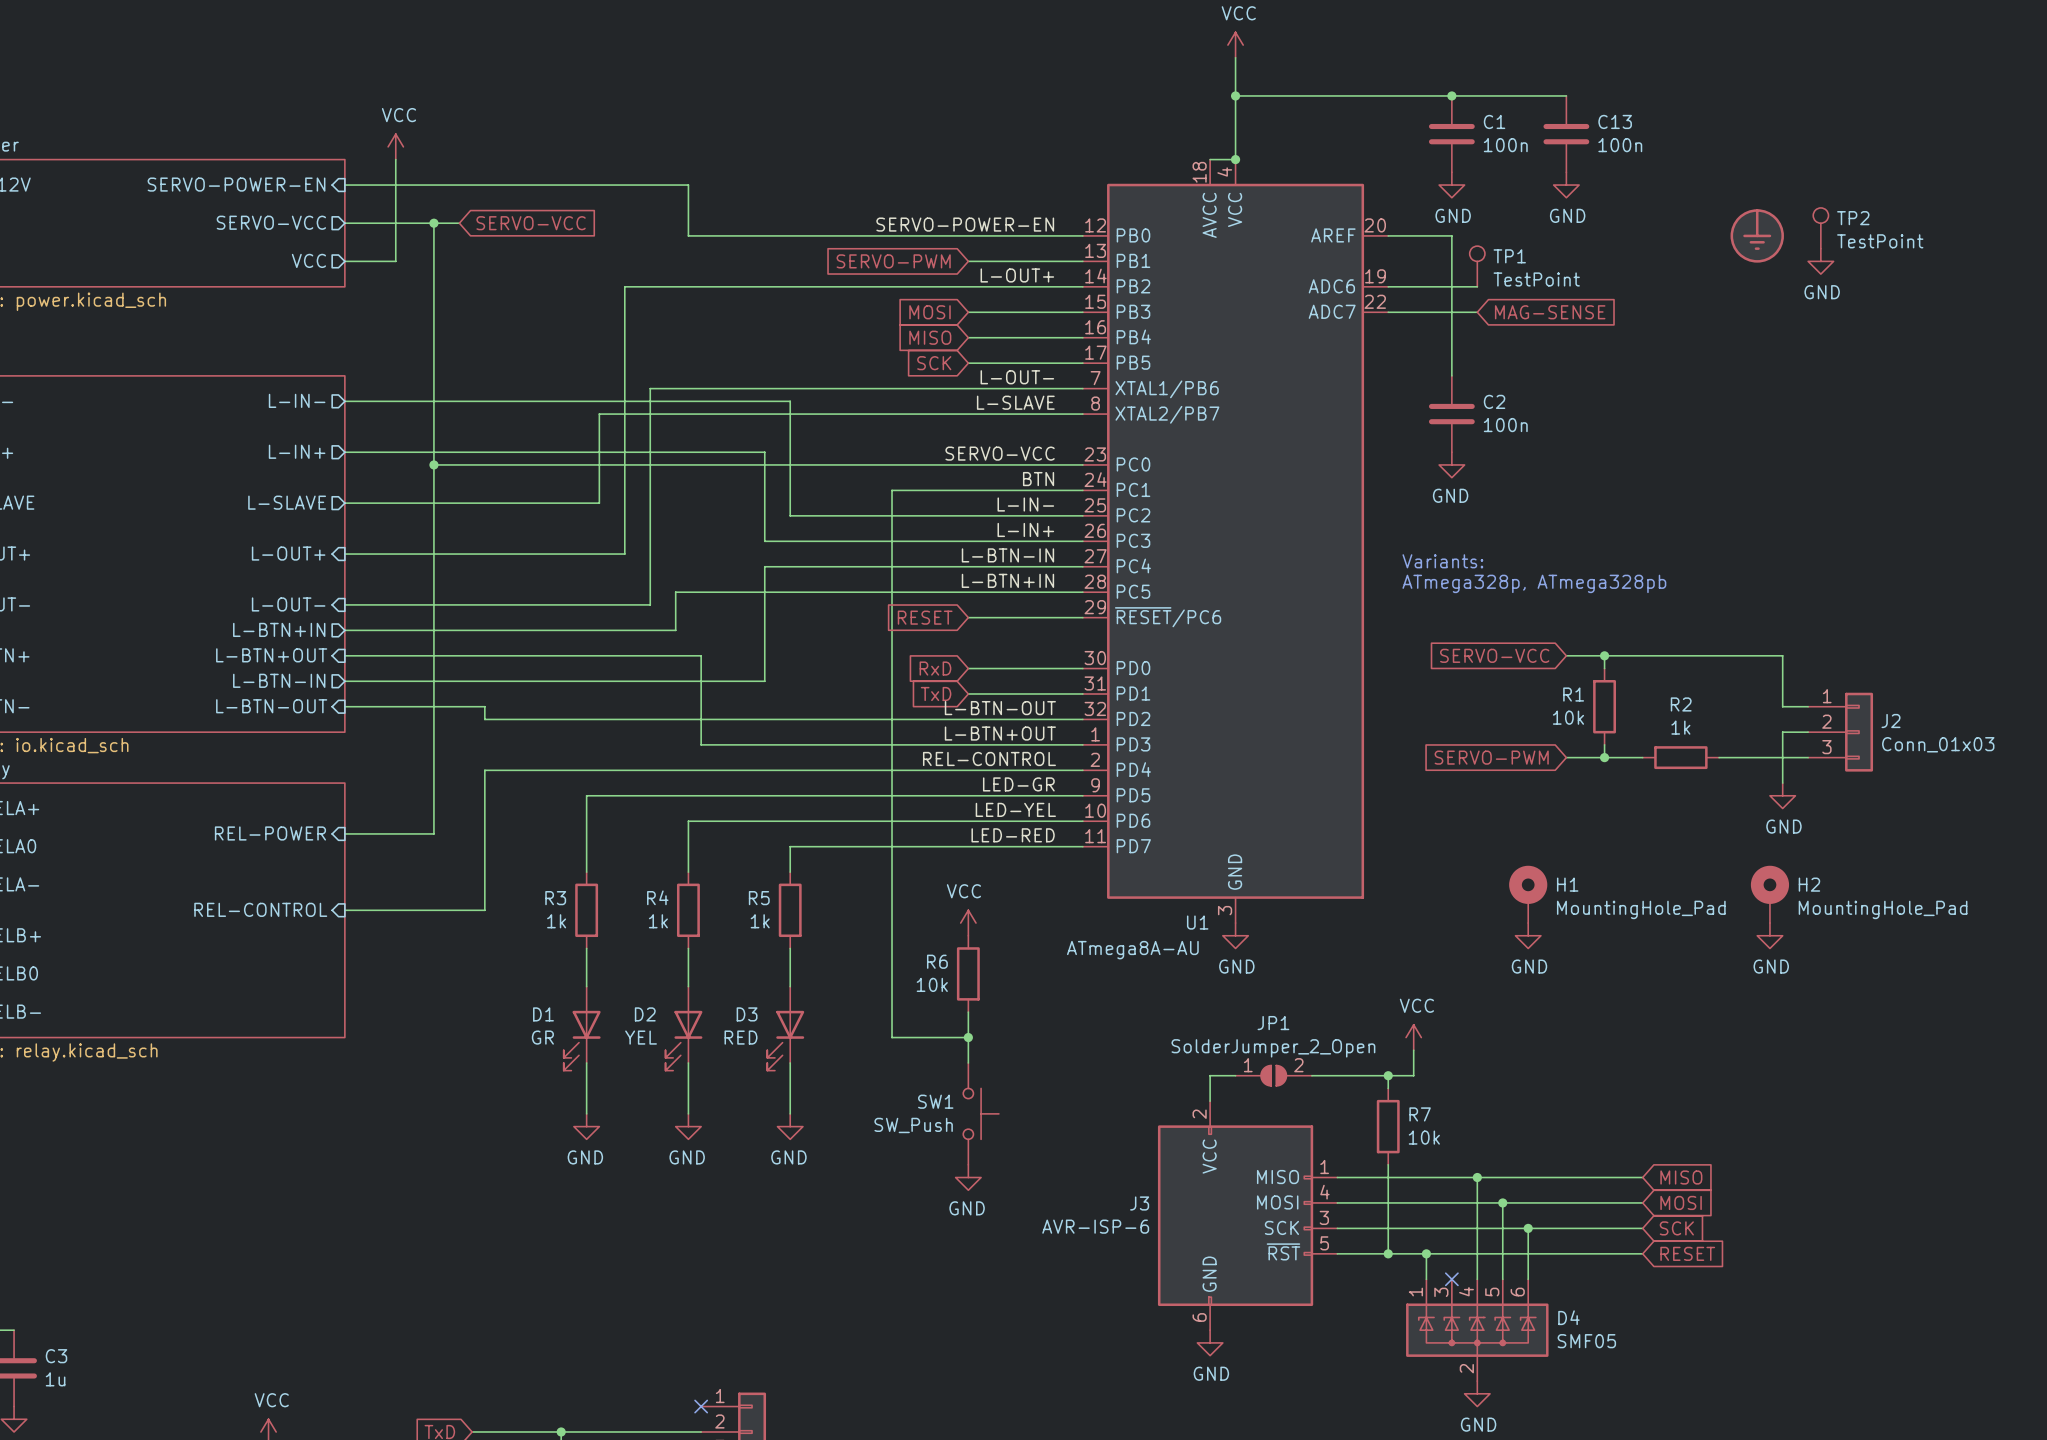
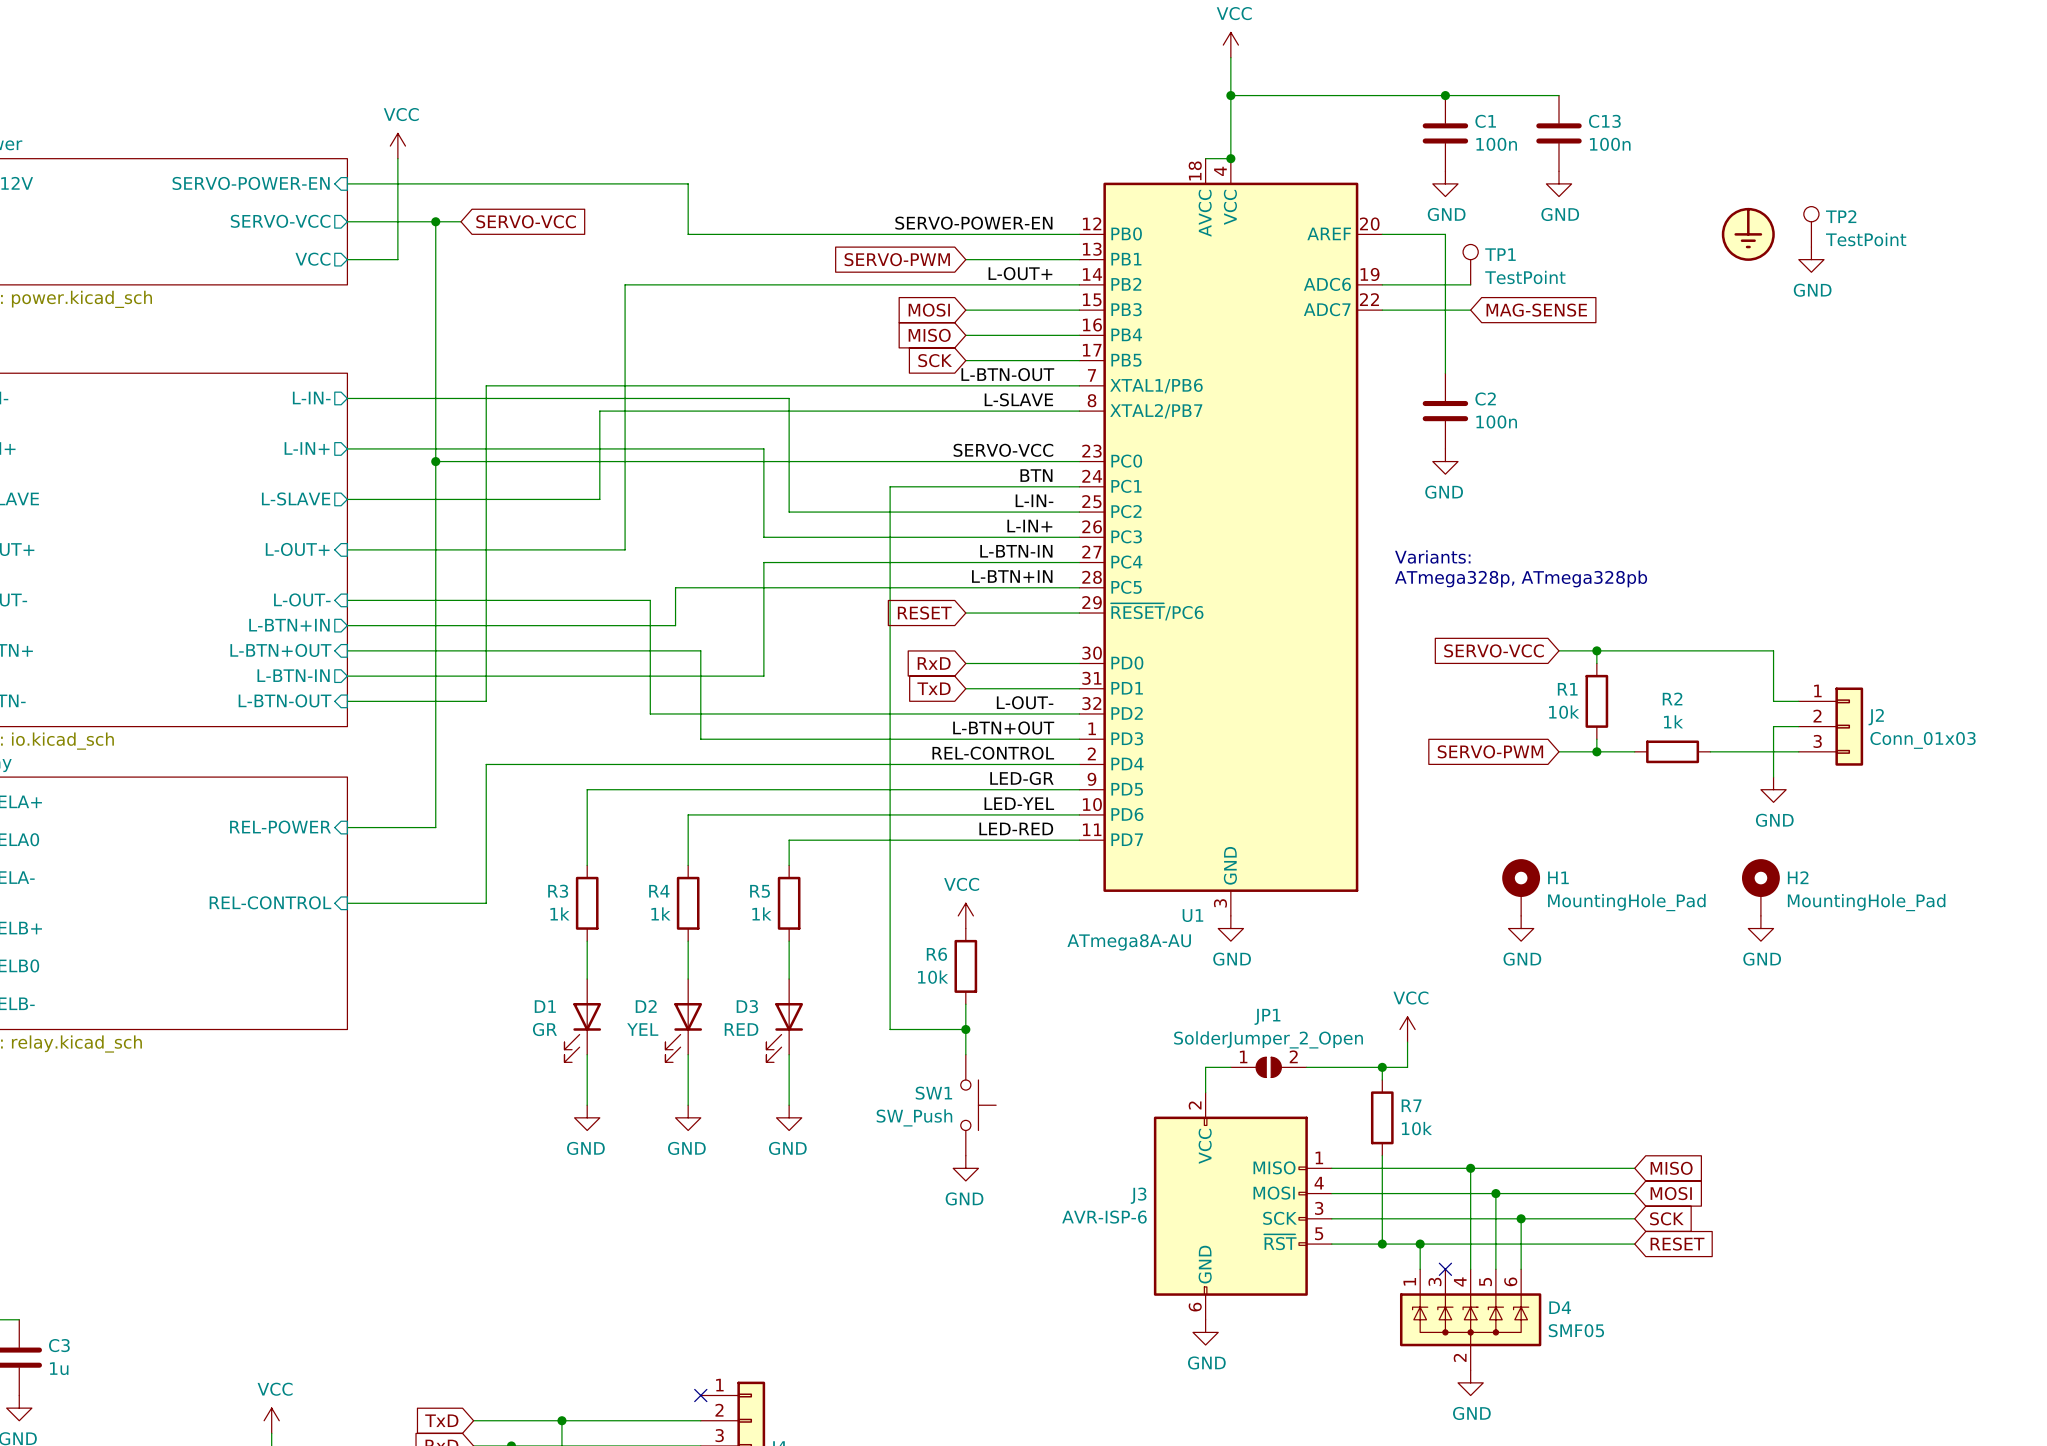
label: L-OUT- (1017, 377) -> L-BTN-OUT (1007, 374)
wire: (650, 388) (650, 604) -> (650, 385) (486, 385) (486, 701)
wire: (484, 706) (484, 719) (650, 719) -> (650, 600) (650, 713)
label: L-BTN-OUT (1000, 708) -> L-OUT- (1025, 702)

